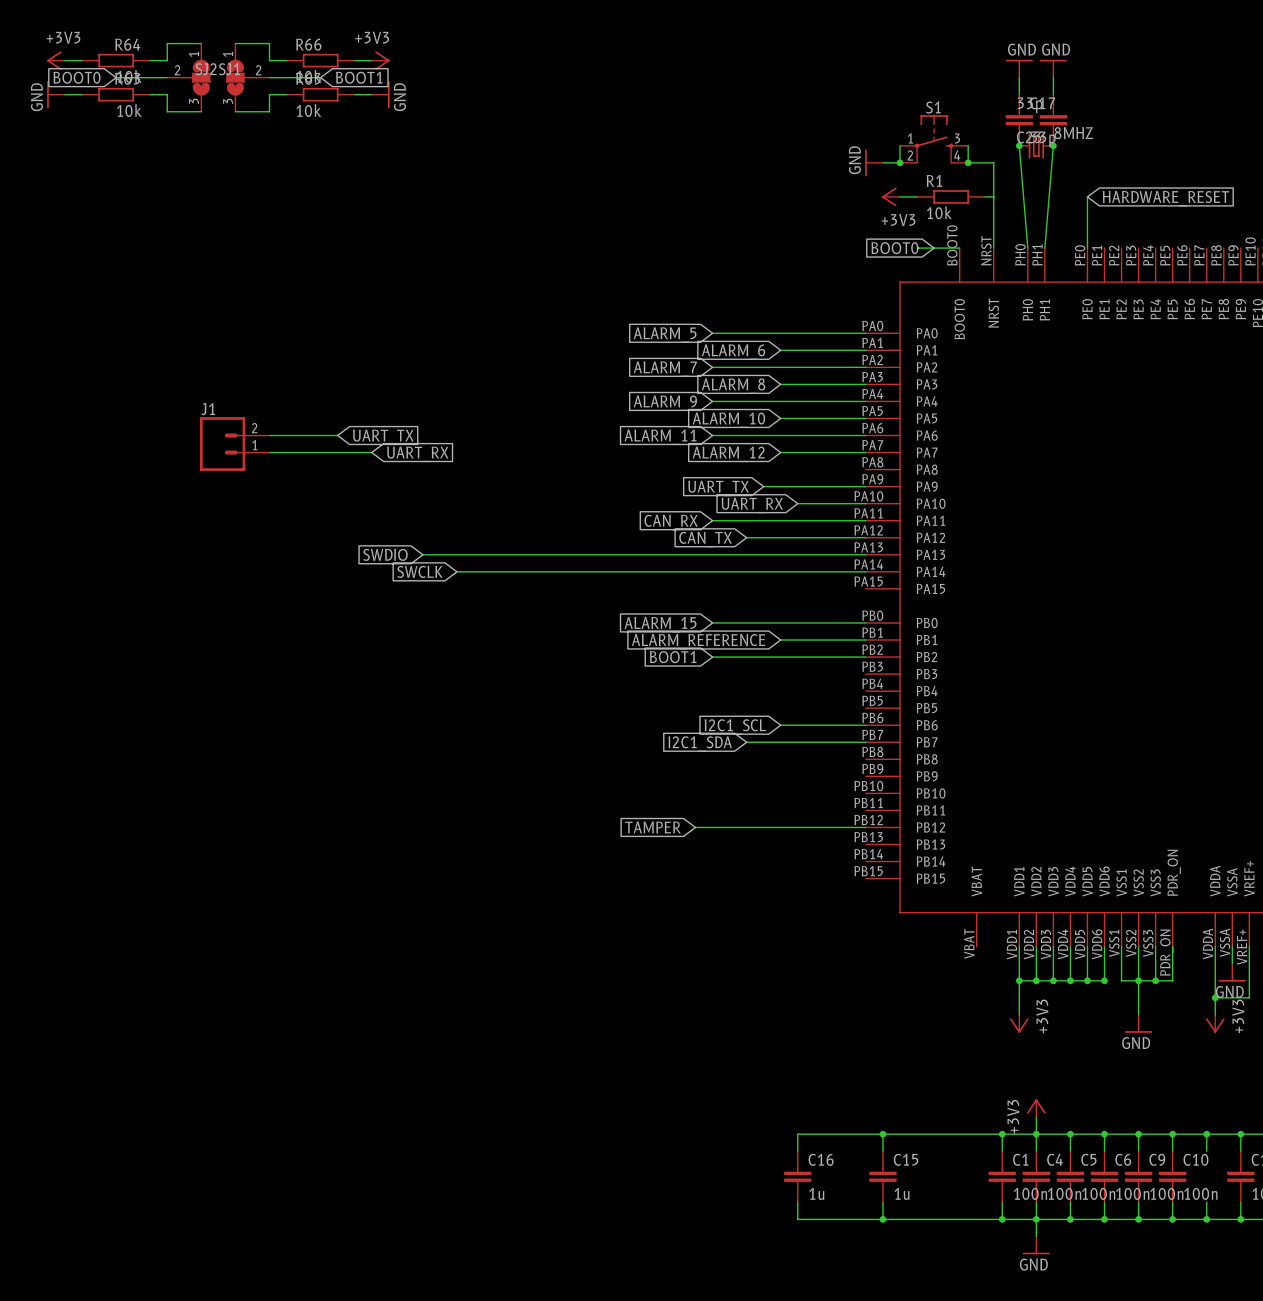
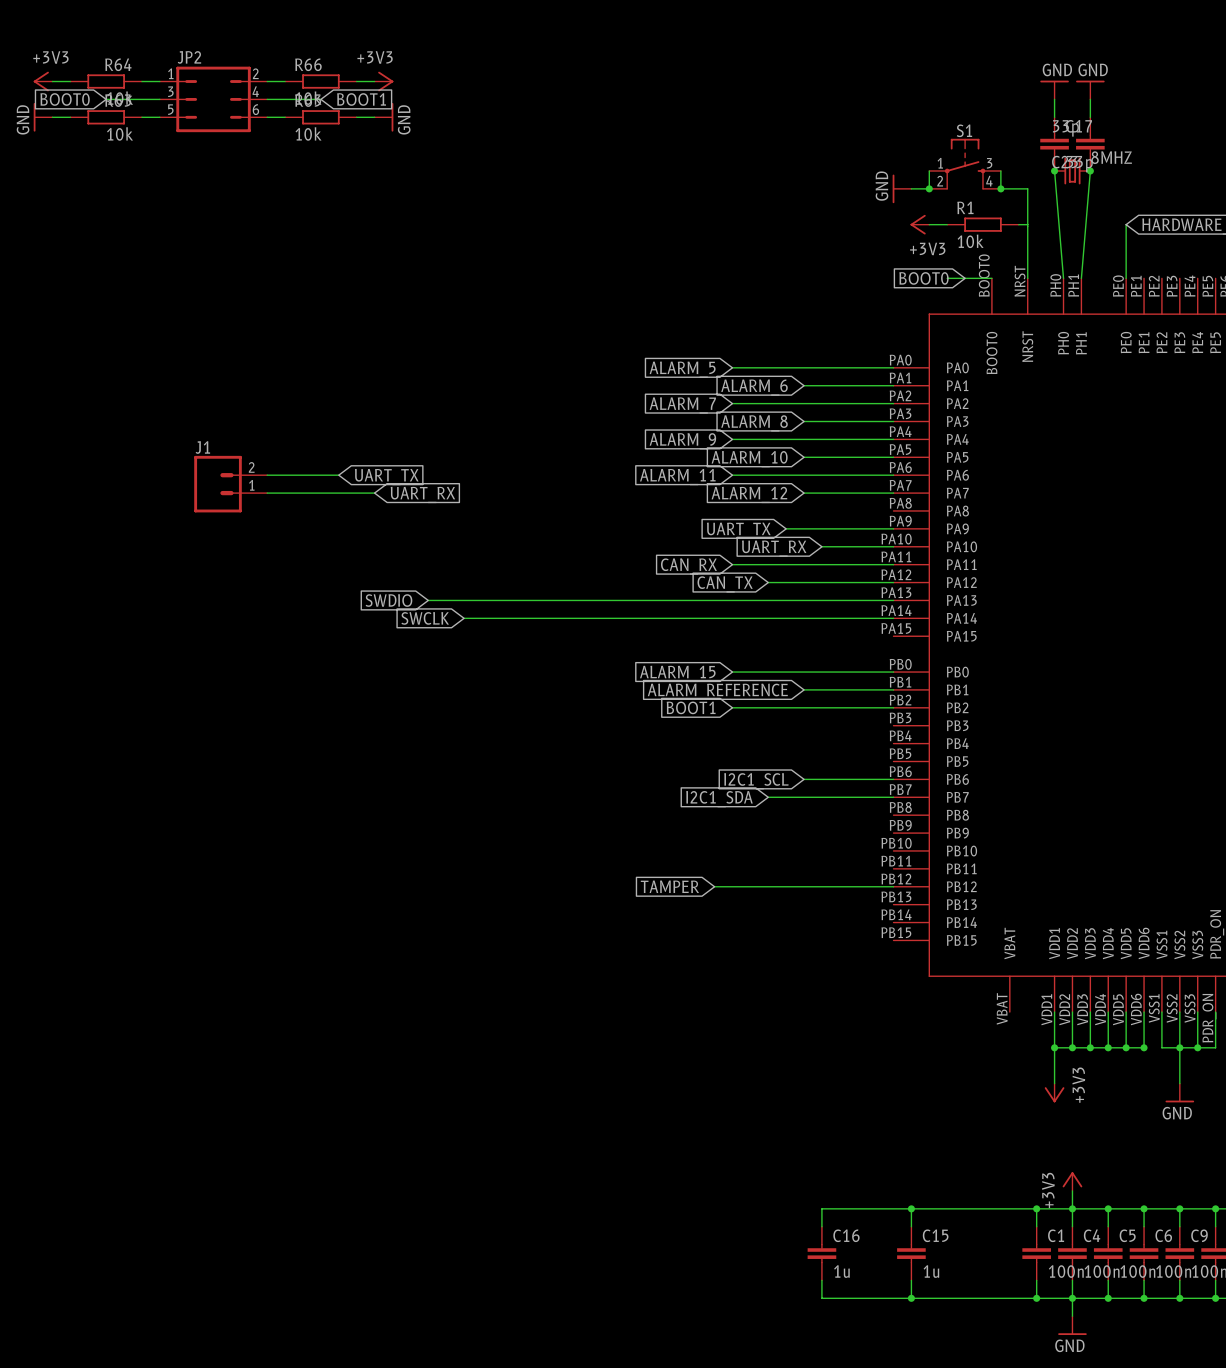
wire: (201, 43) (167, 43) (167, 60) -> none
wire: (235, 43) (269, 43) (269, 60) -> none
SJ1: (188, 77) -> none
JP2: none -> (213, 99)
SJ2: (247, 77) -> none
wire: (167, 94) (167, 111) (201, 111) -> none
wire: (269, 94) (269, 111) (235, 111) -> none

